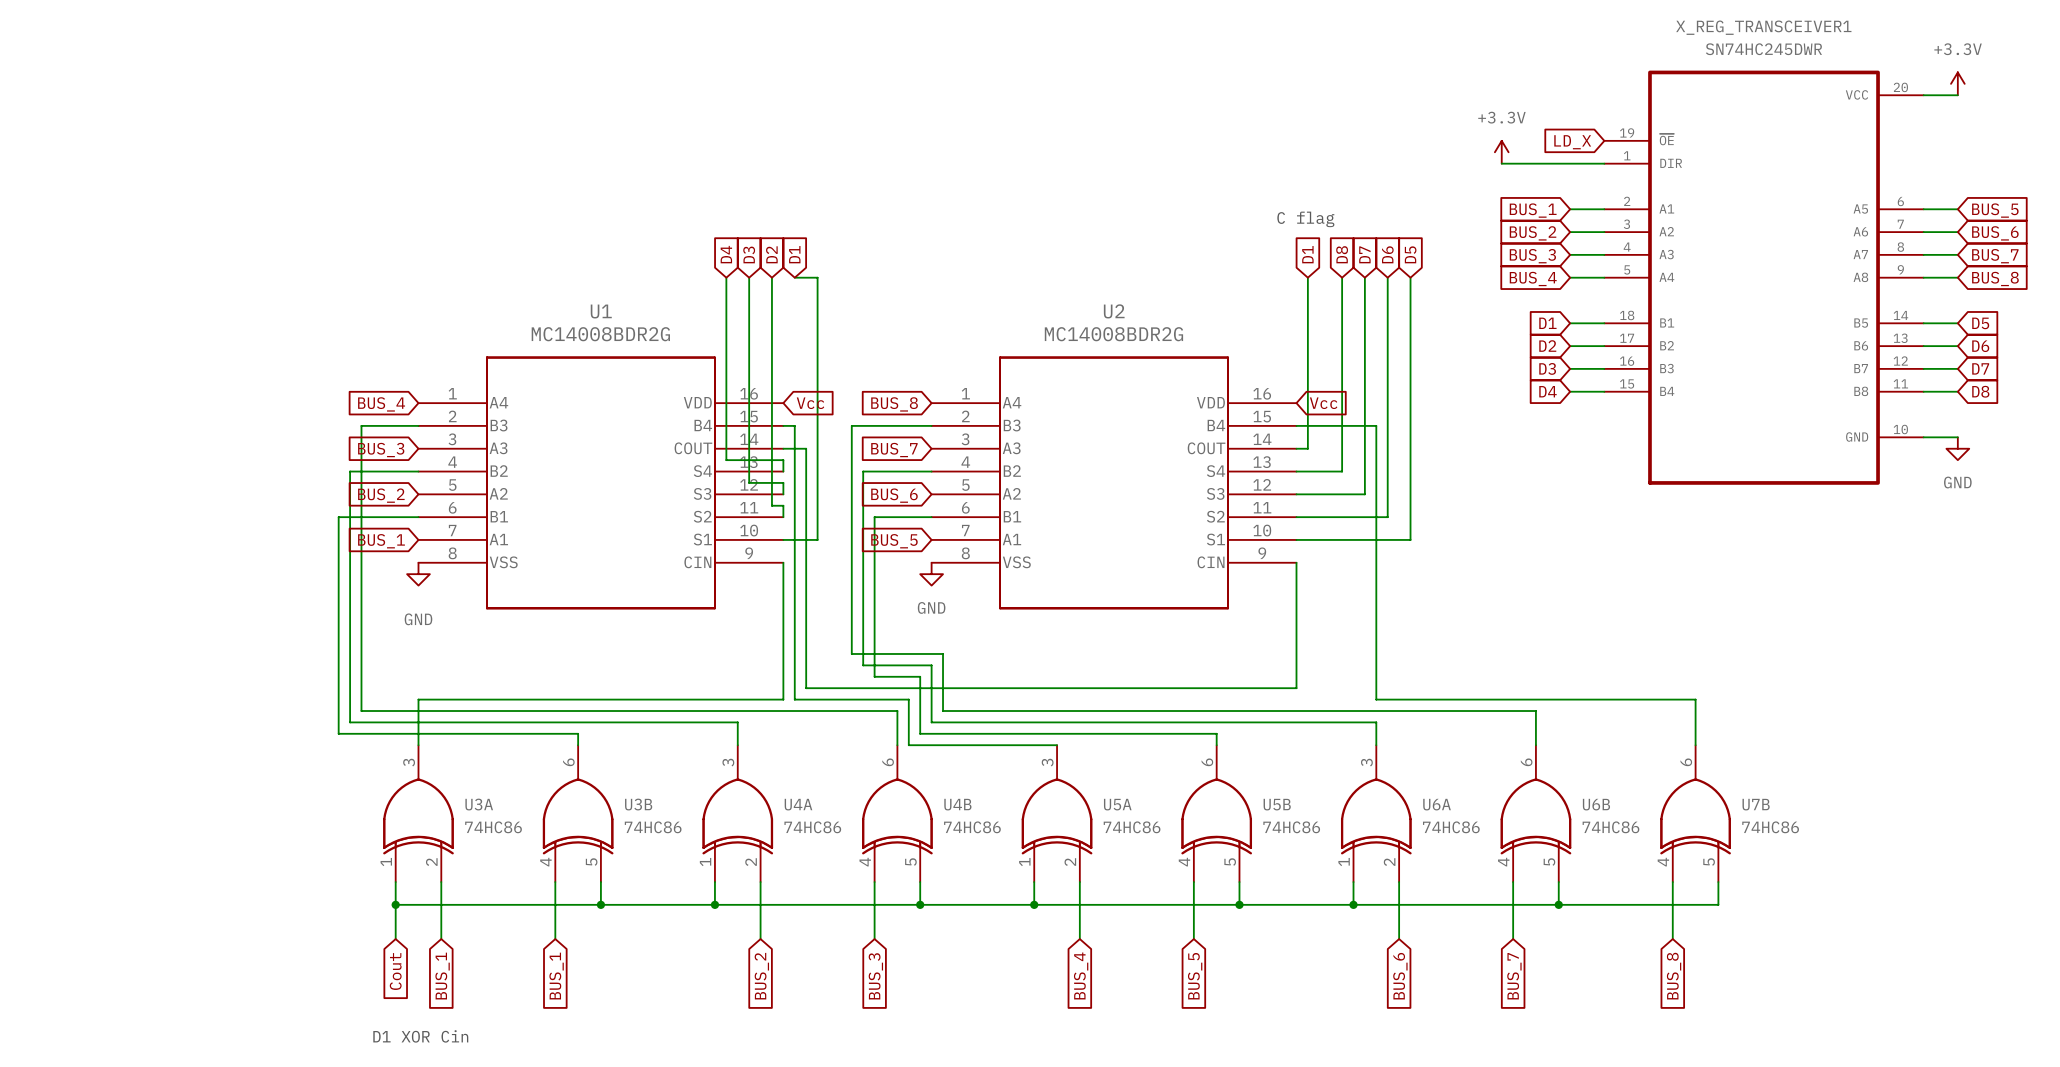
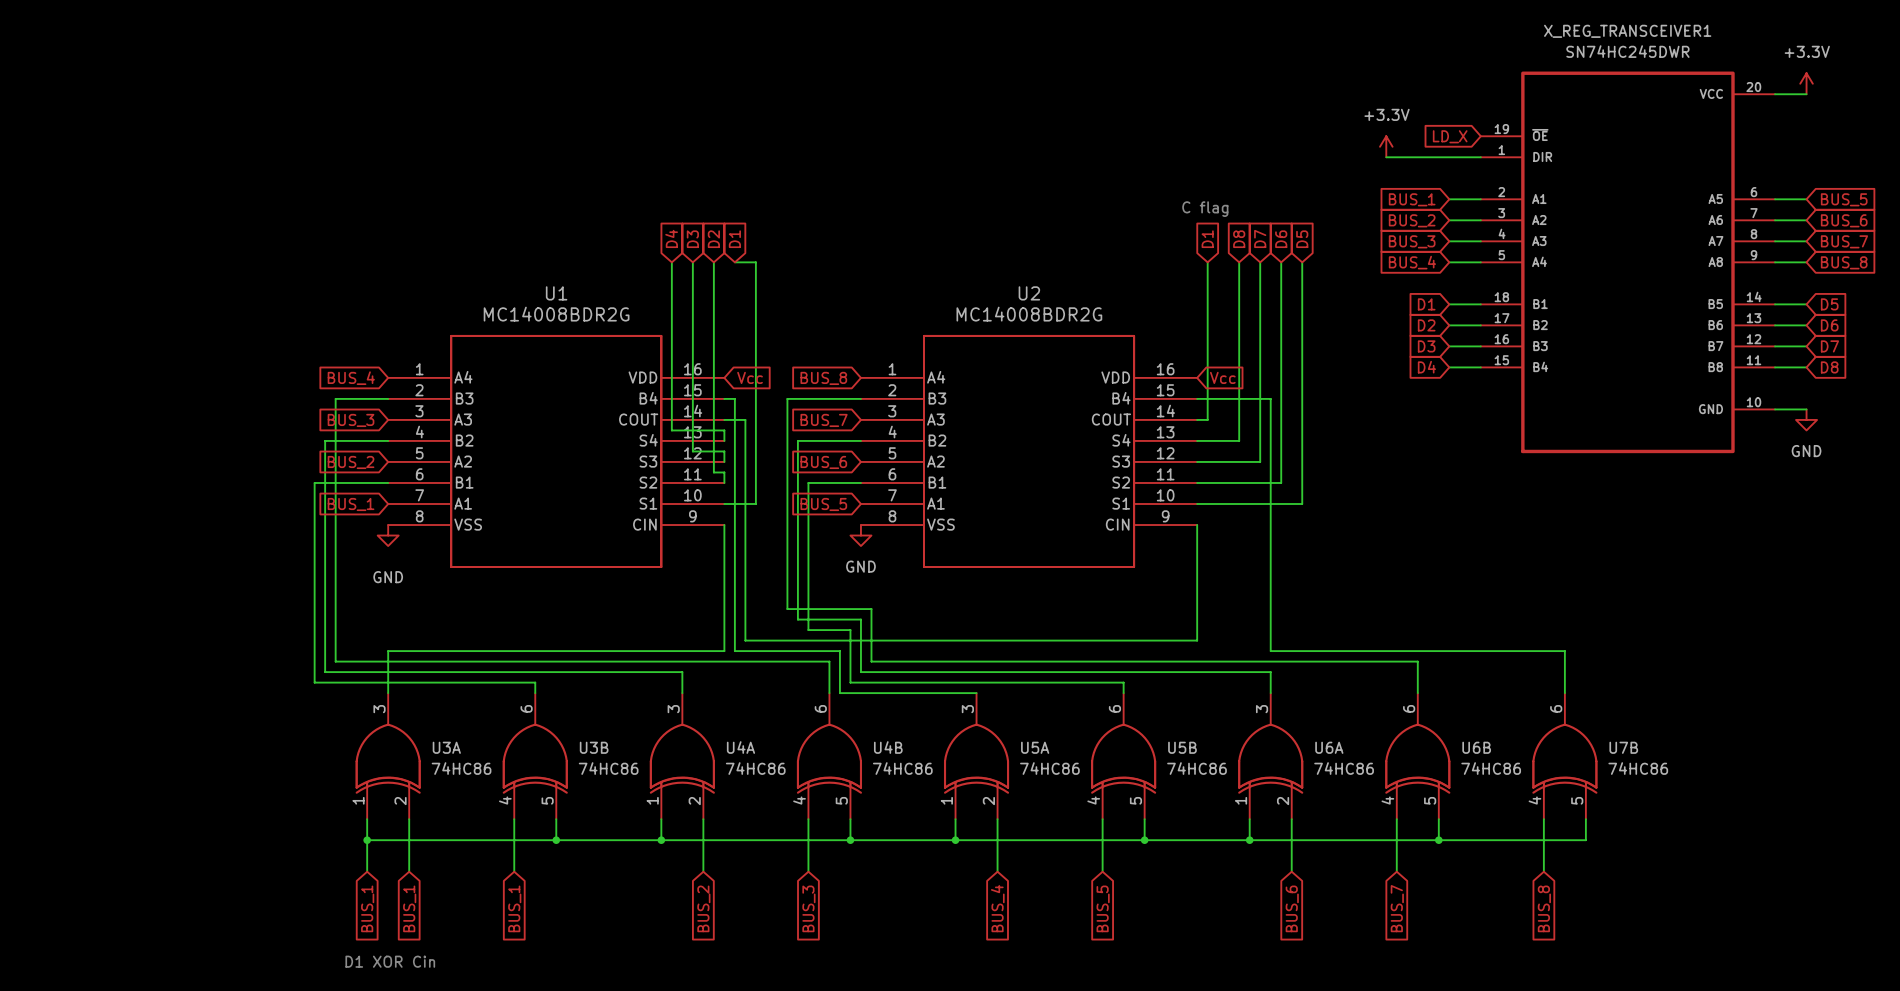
global label: Cout (395, 971) -> BUS_1 (367, 908)

